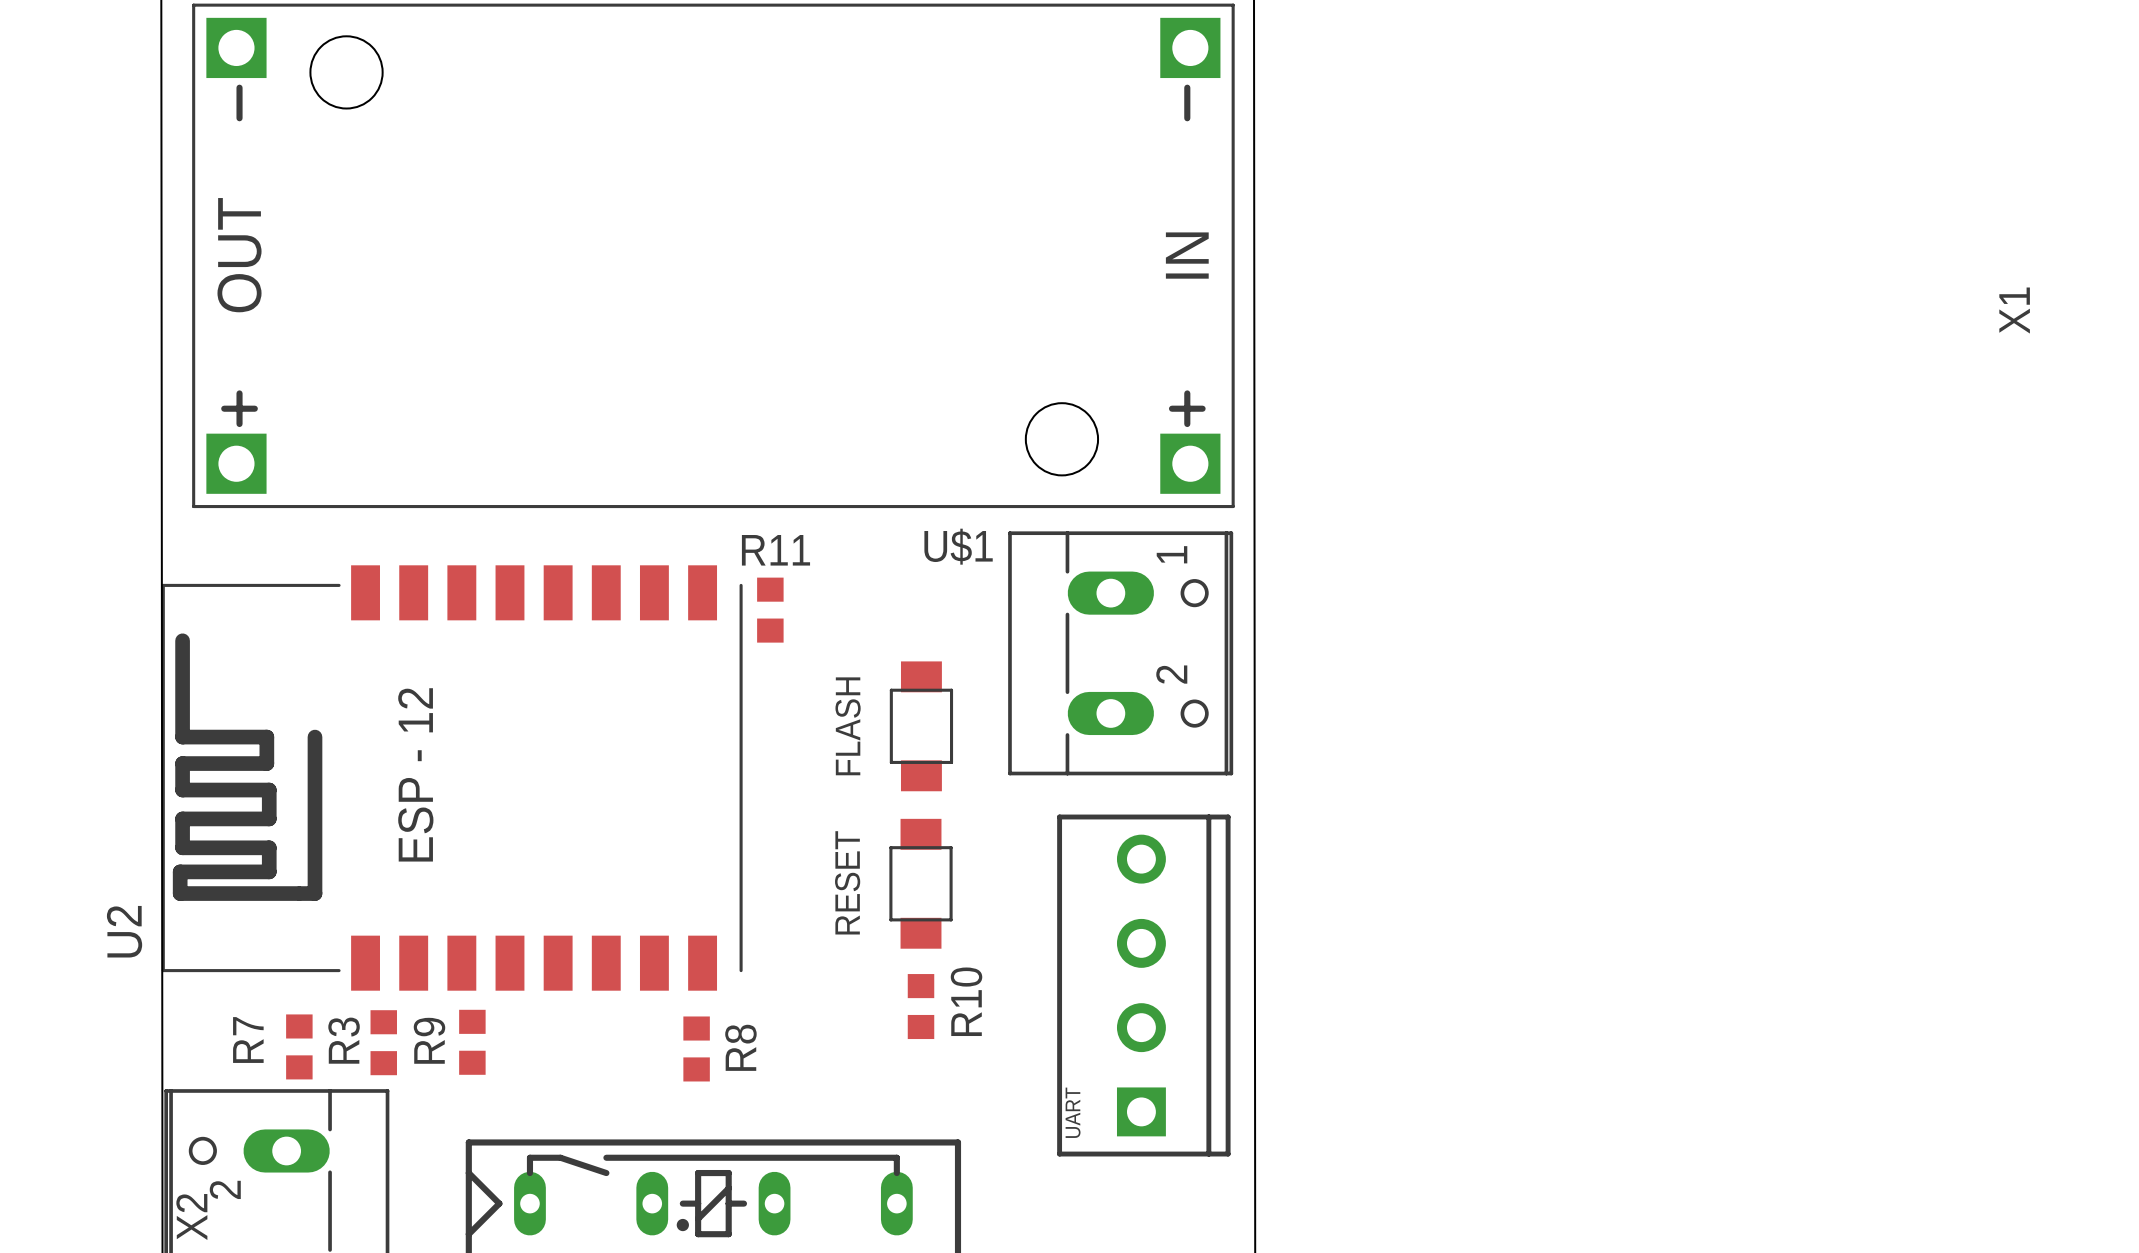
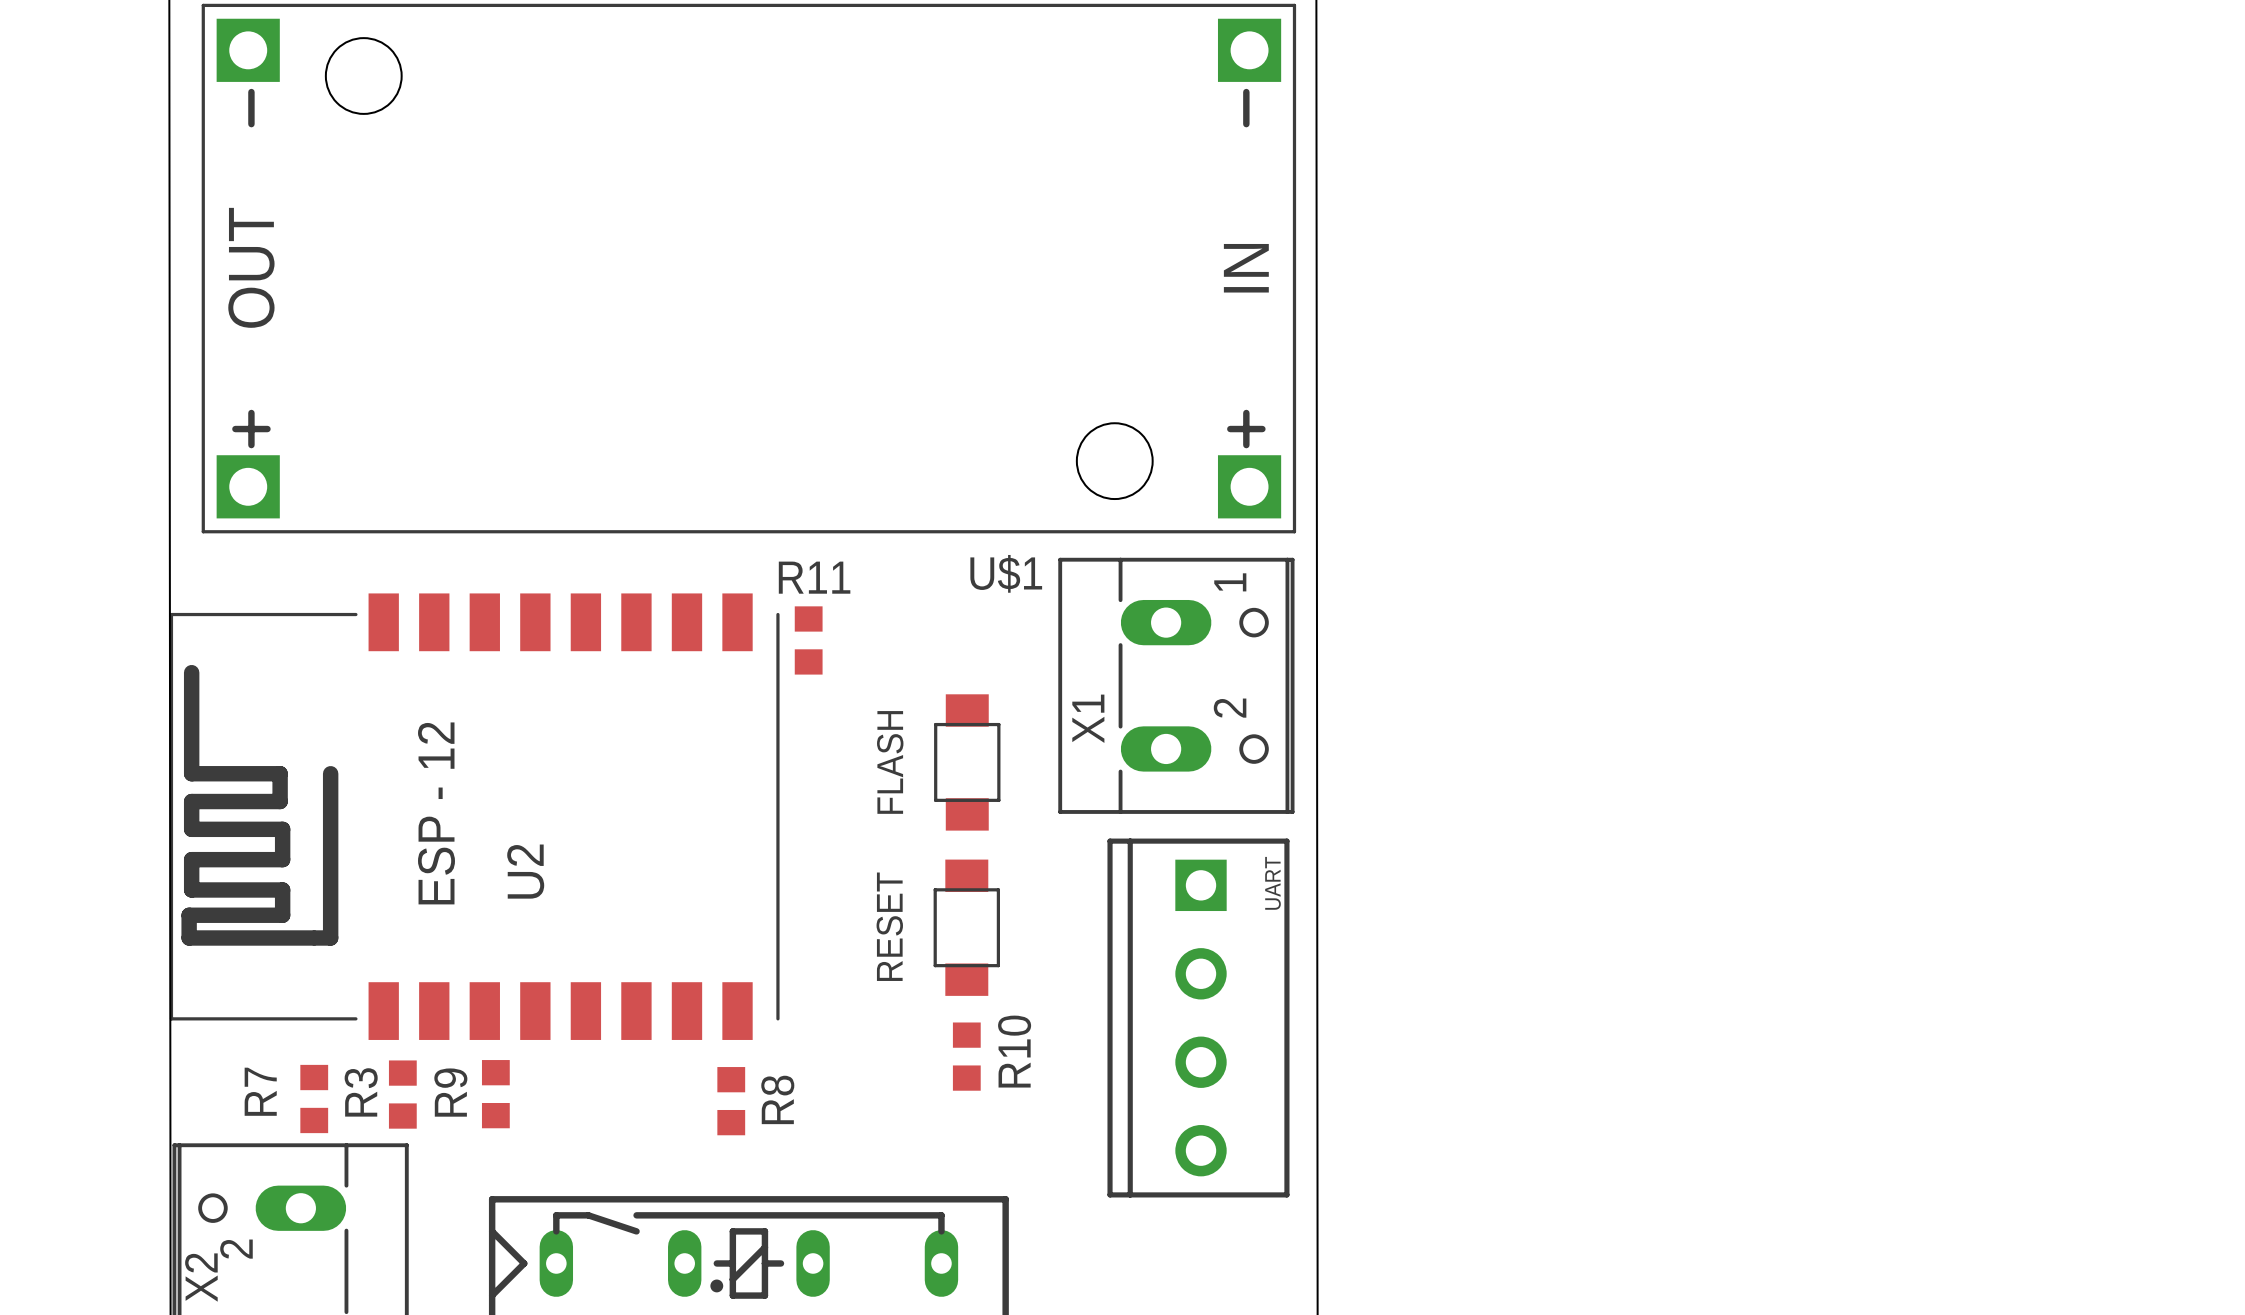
X1 name position: X1 (2014, 310) -> X1 (1088, 718)
U2 name position: U2 (124, 931) -> U2 (525, 871)
UART rotation: 0° (1143, 985) -> 180° (1198, 1018)

